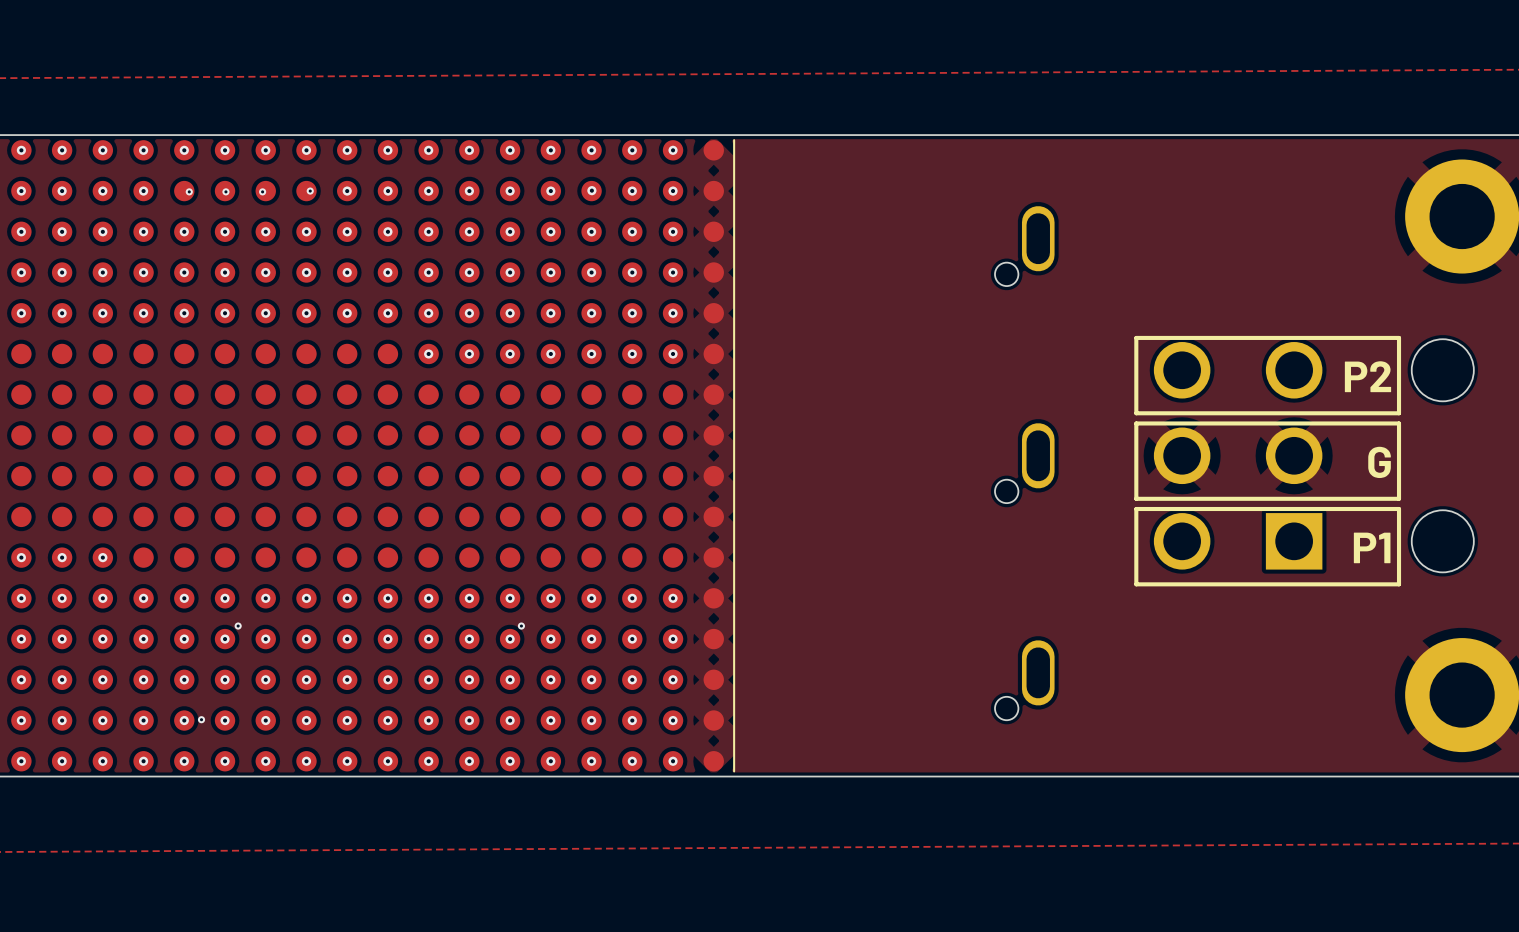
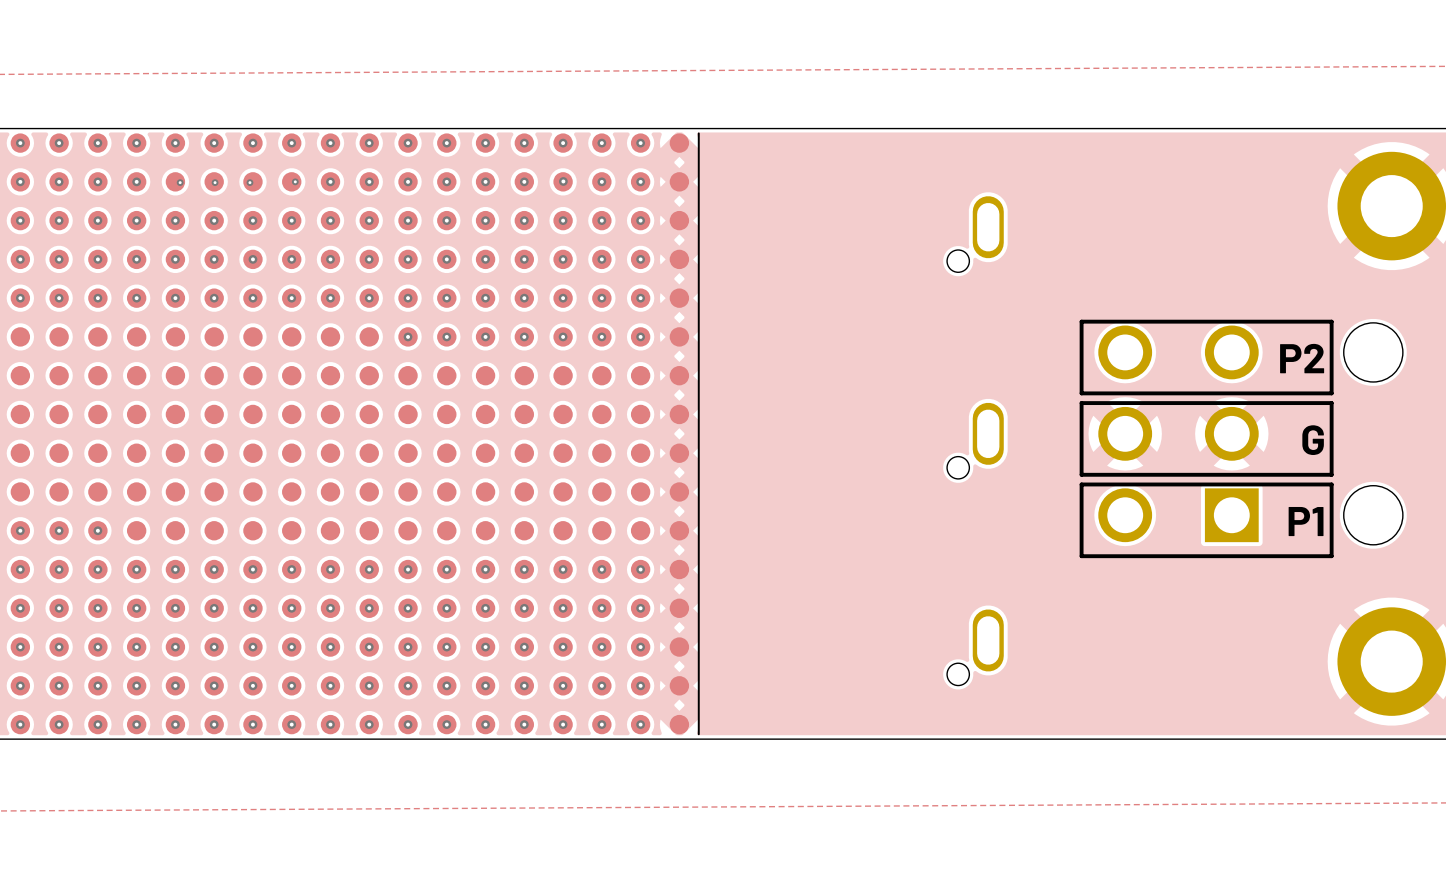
via: (238, 626) -> none
via: (521, 626) -> none
via: (201, 719) -> none

